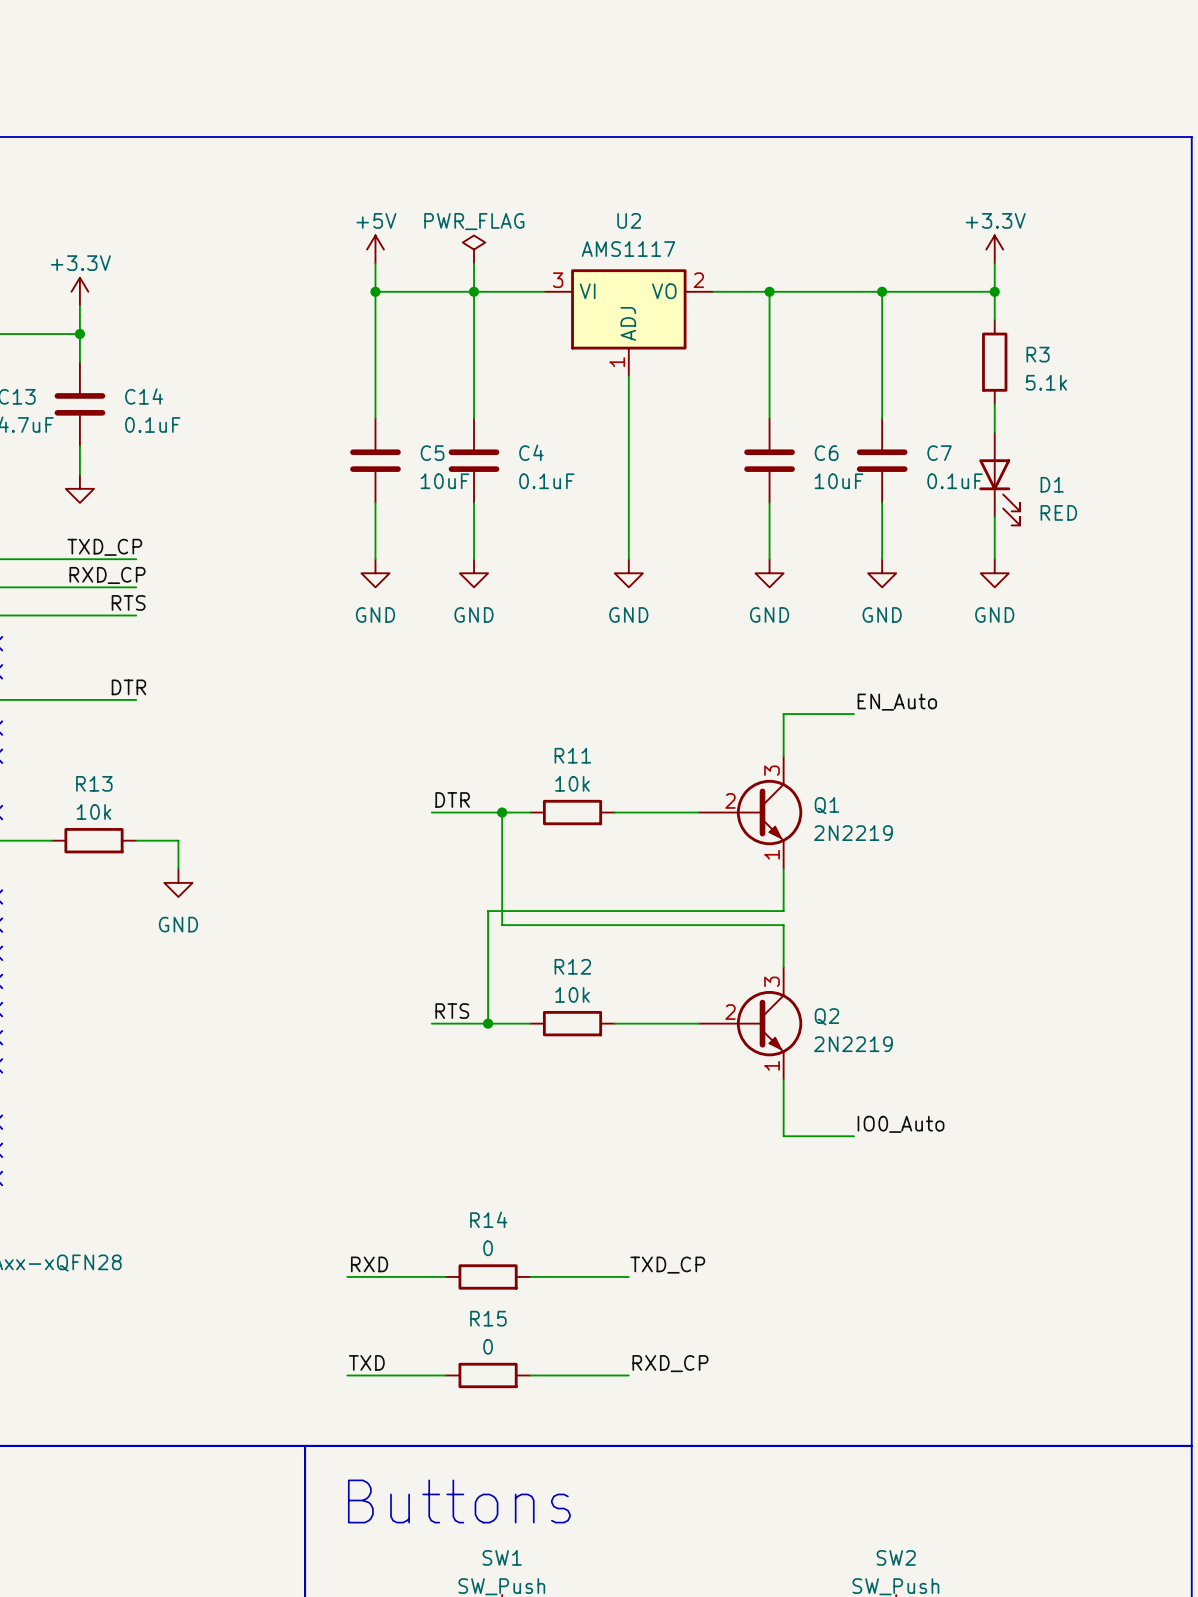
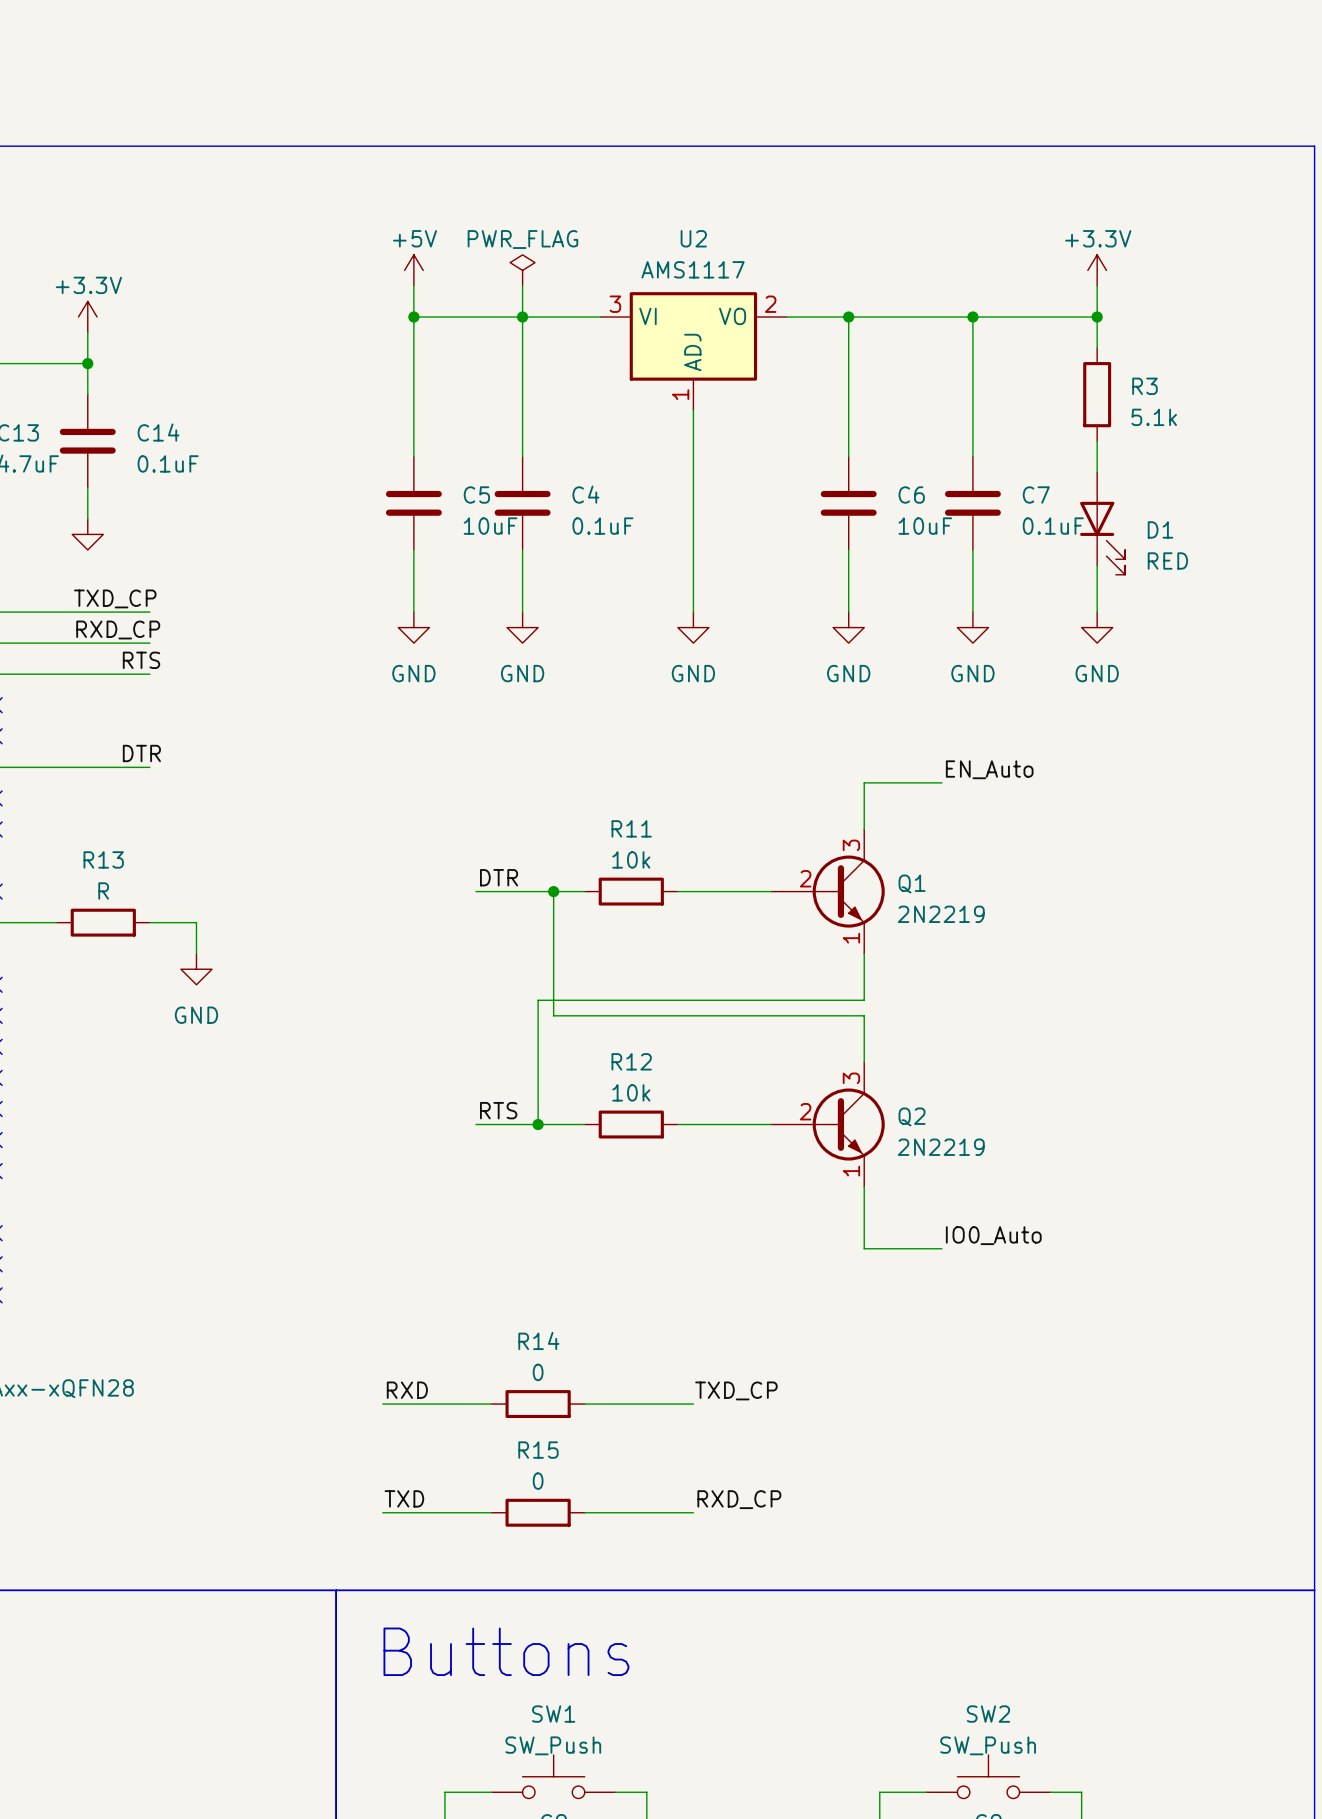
R13 value: 10k (94, 812) -> R (103, 891)

